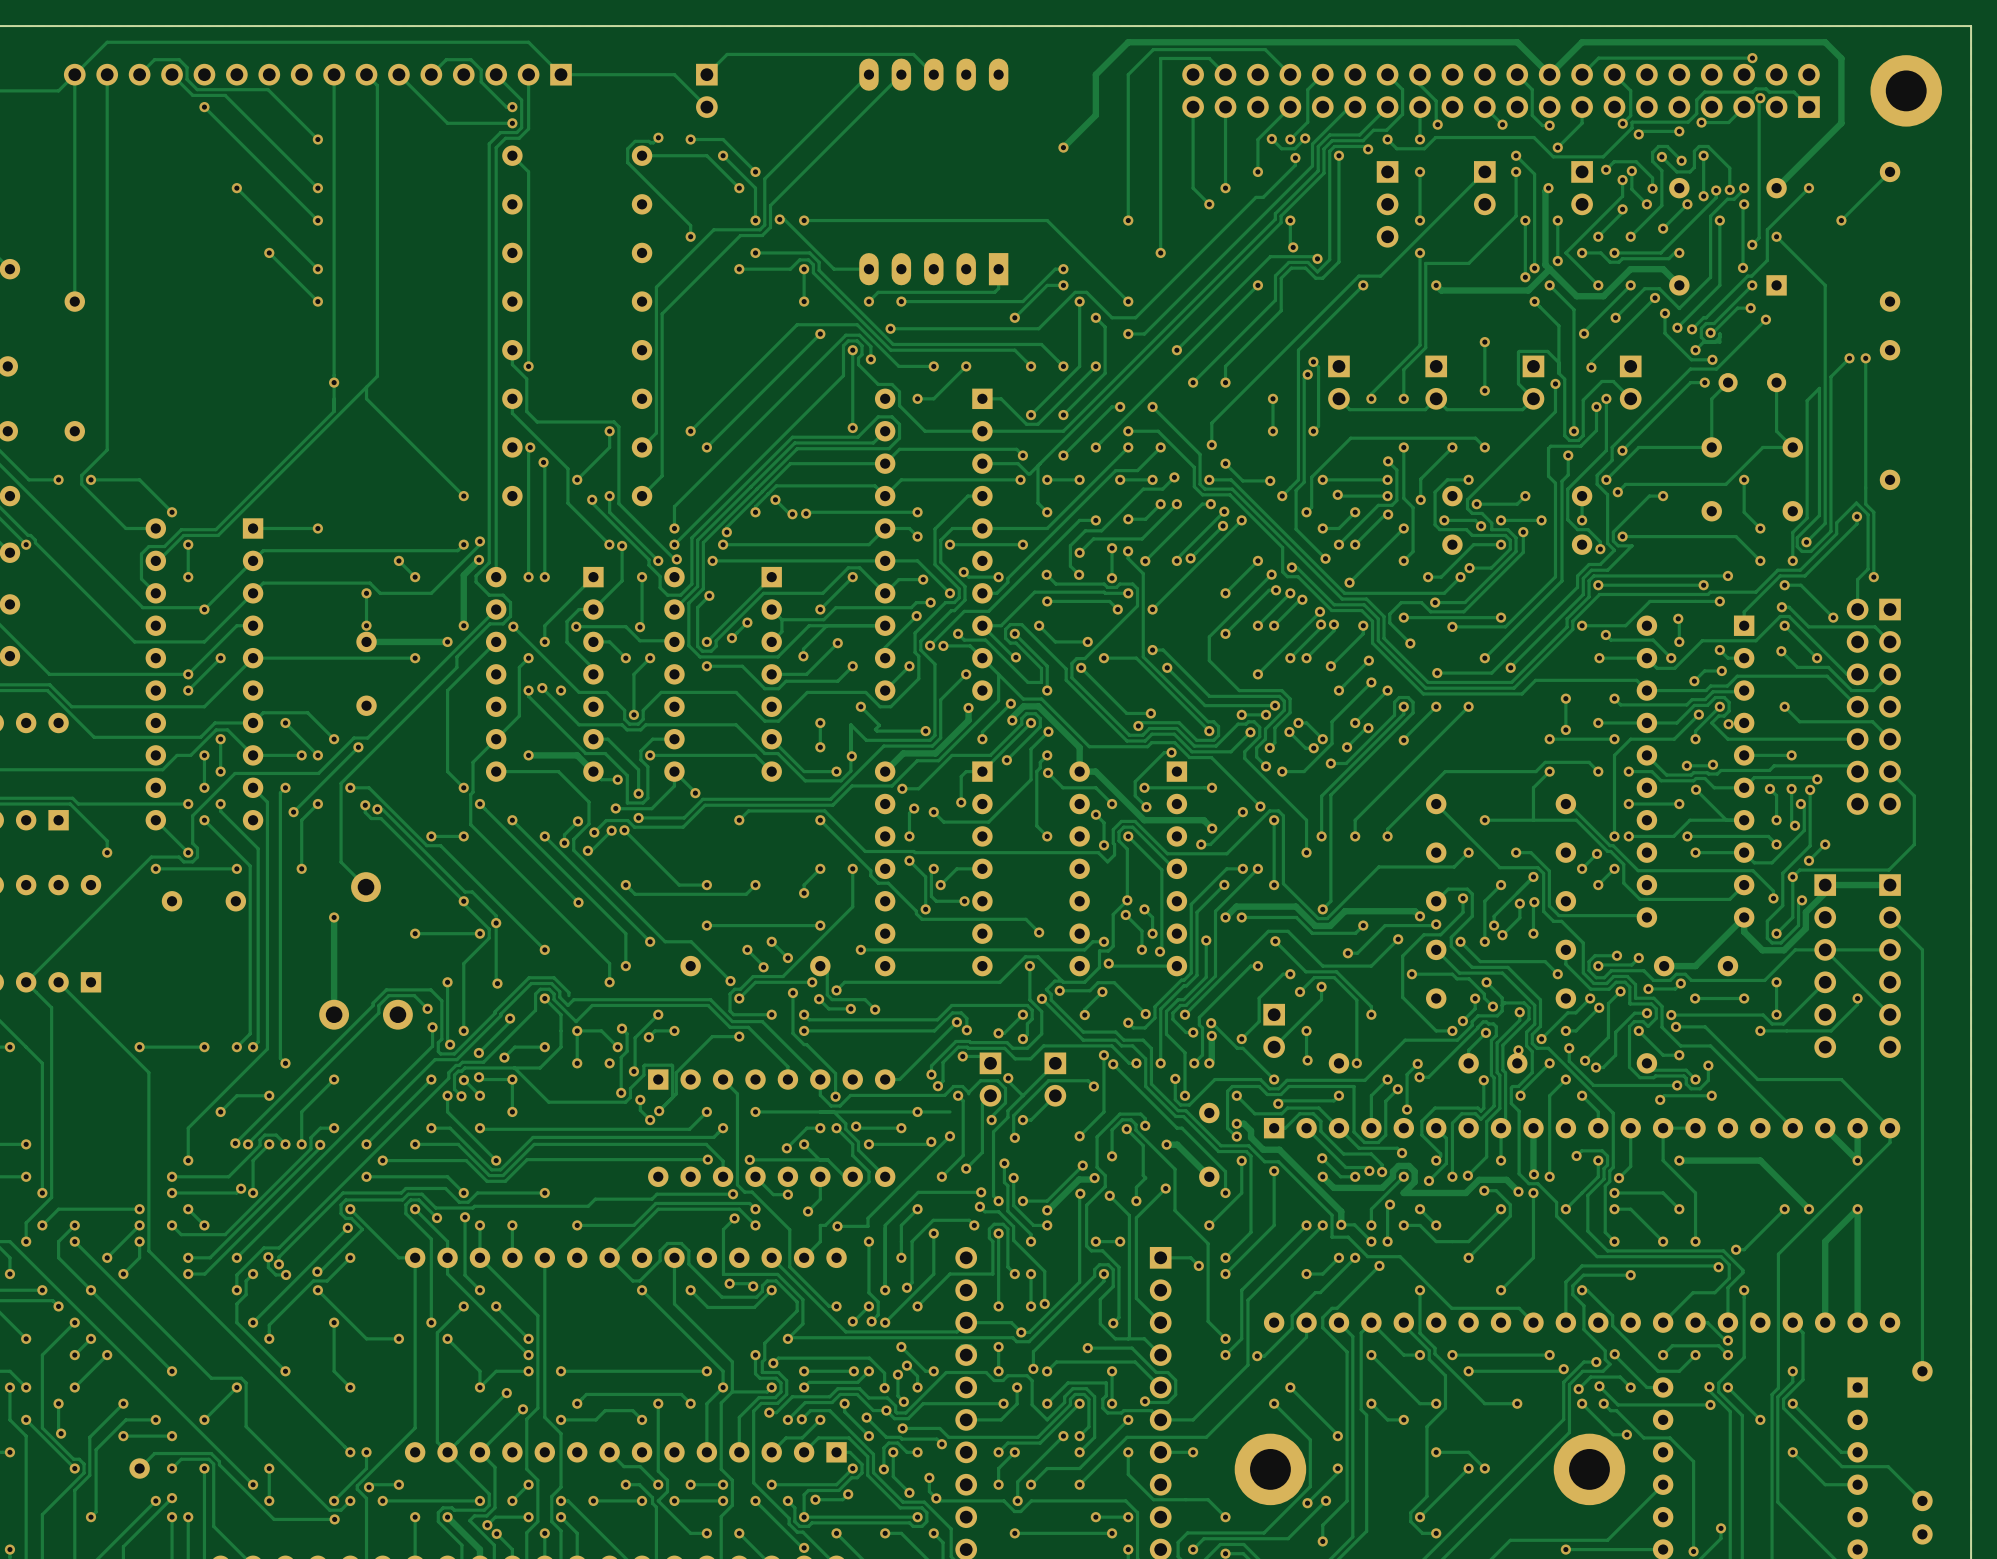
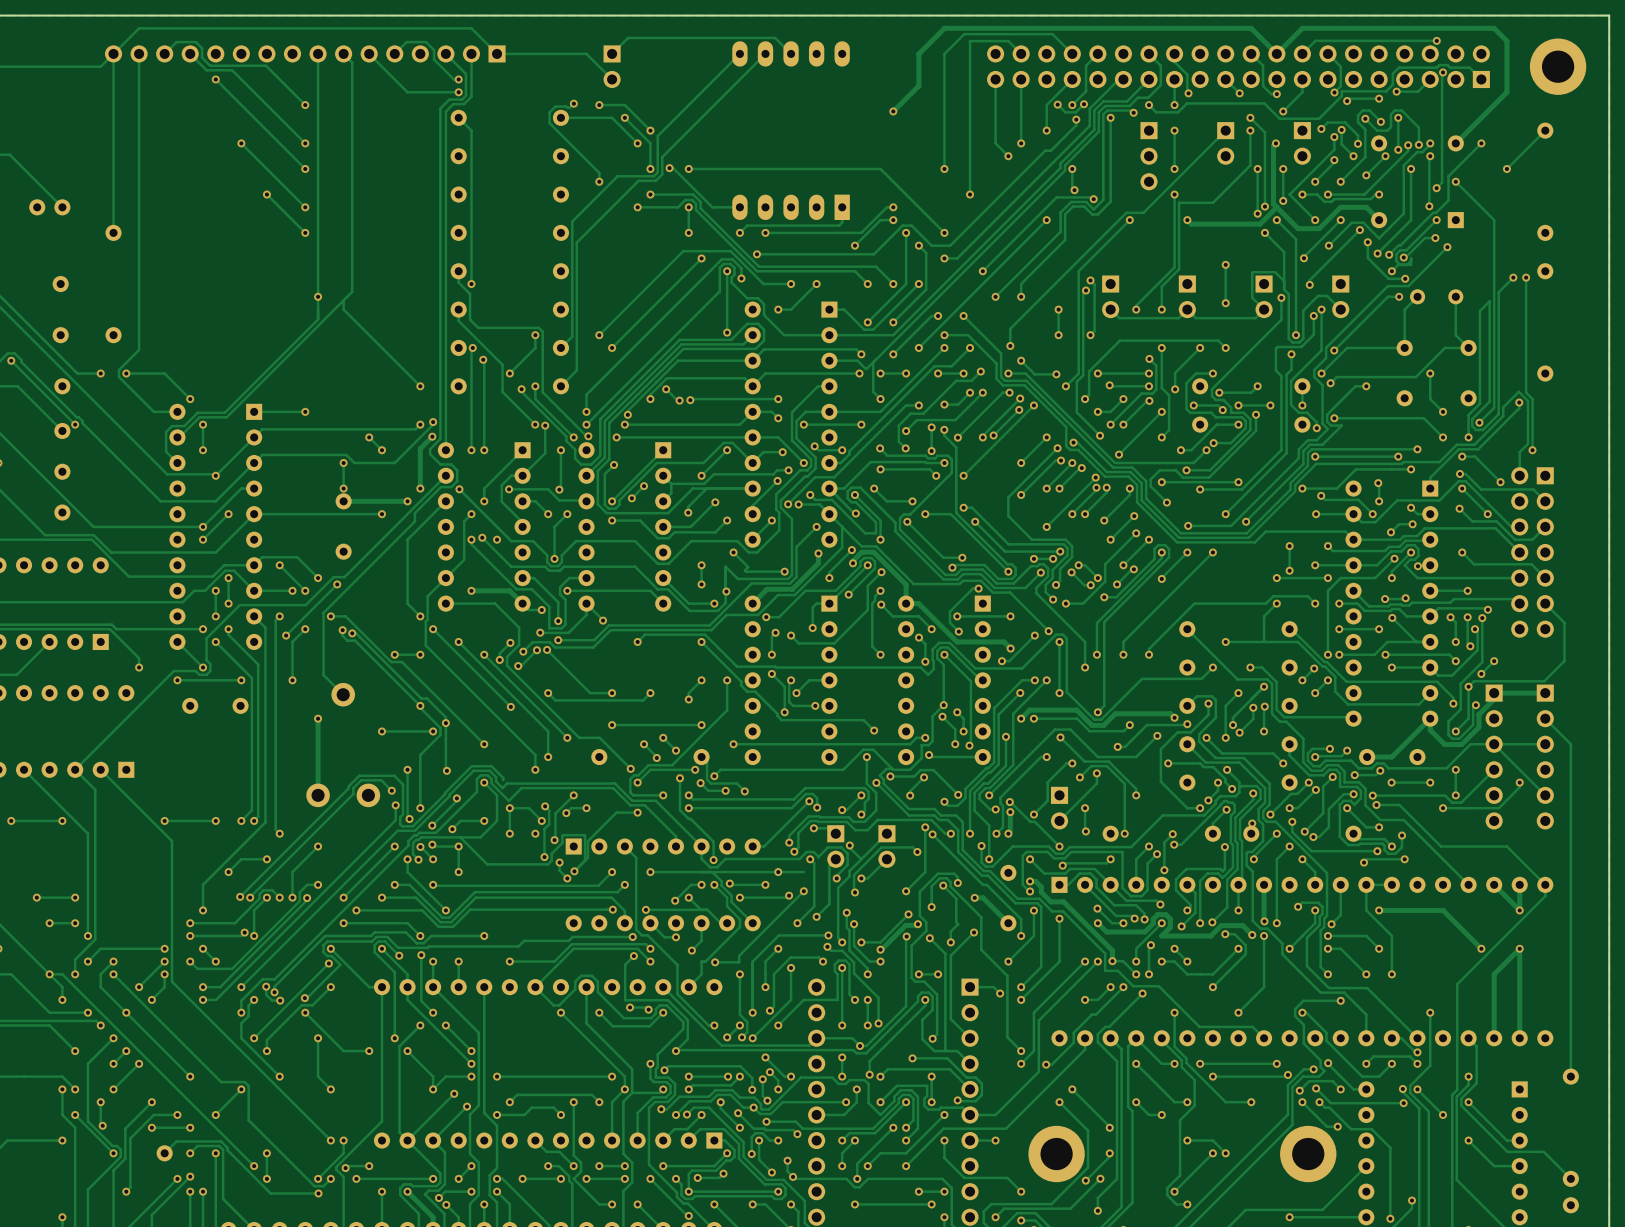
track: (1784, 1209) (1744, 1249) (1736, 1249) -> none
via: (1784, 1209) -> none
via: (1736, 1249) -> none
track: (1607, 1250) (1723, 1250) (1742, 1270) (1742, 1272) (1727, 1287) (1727, 1322) -> (1322, 981) (1328, 988) (1367, 988) (1417, 1038)
track: (1597, 1256) (1721, 1256) (1729, 1264) (1729, 1278) (1714, 1292) (1693, 1292) (1663, 1322) -> (1314, 986) (1320, 992) (1344, 992) (1366, 1014) (1366, 1038)
track: (1718, 1267) (1582, 1265) (1565, 1282) (1565, 1322) -> none
via: (1718, 1267) -> none

